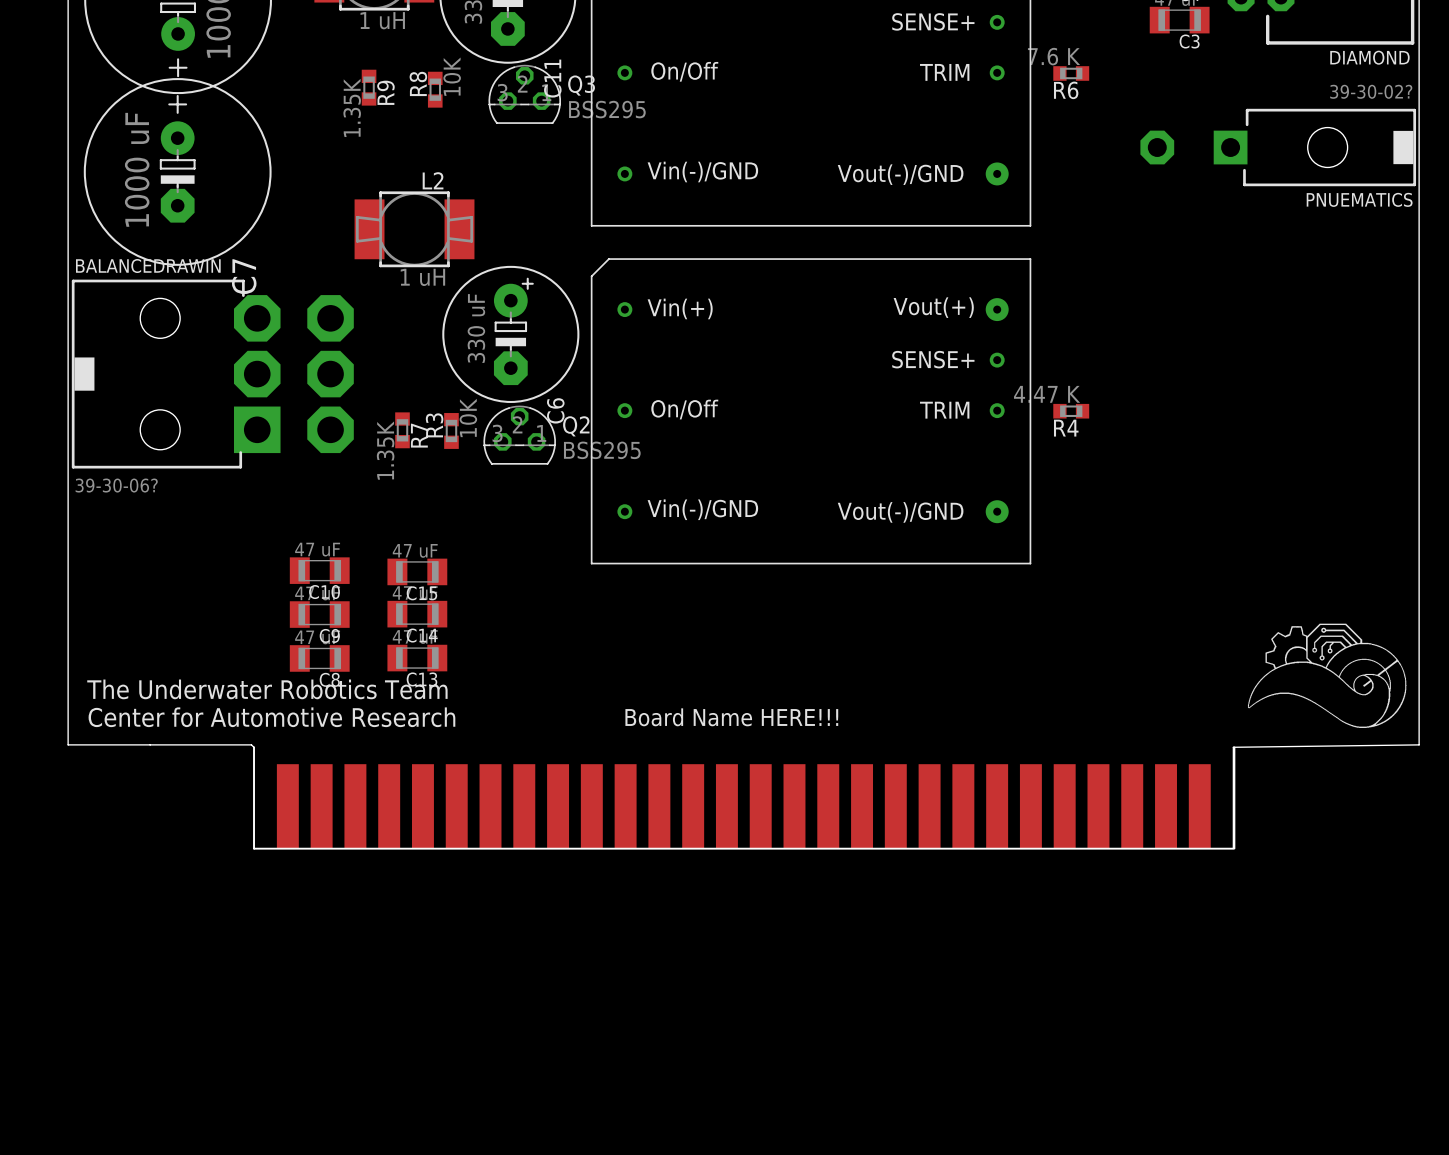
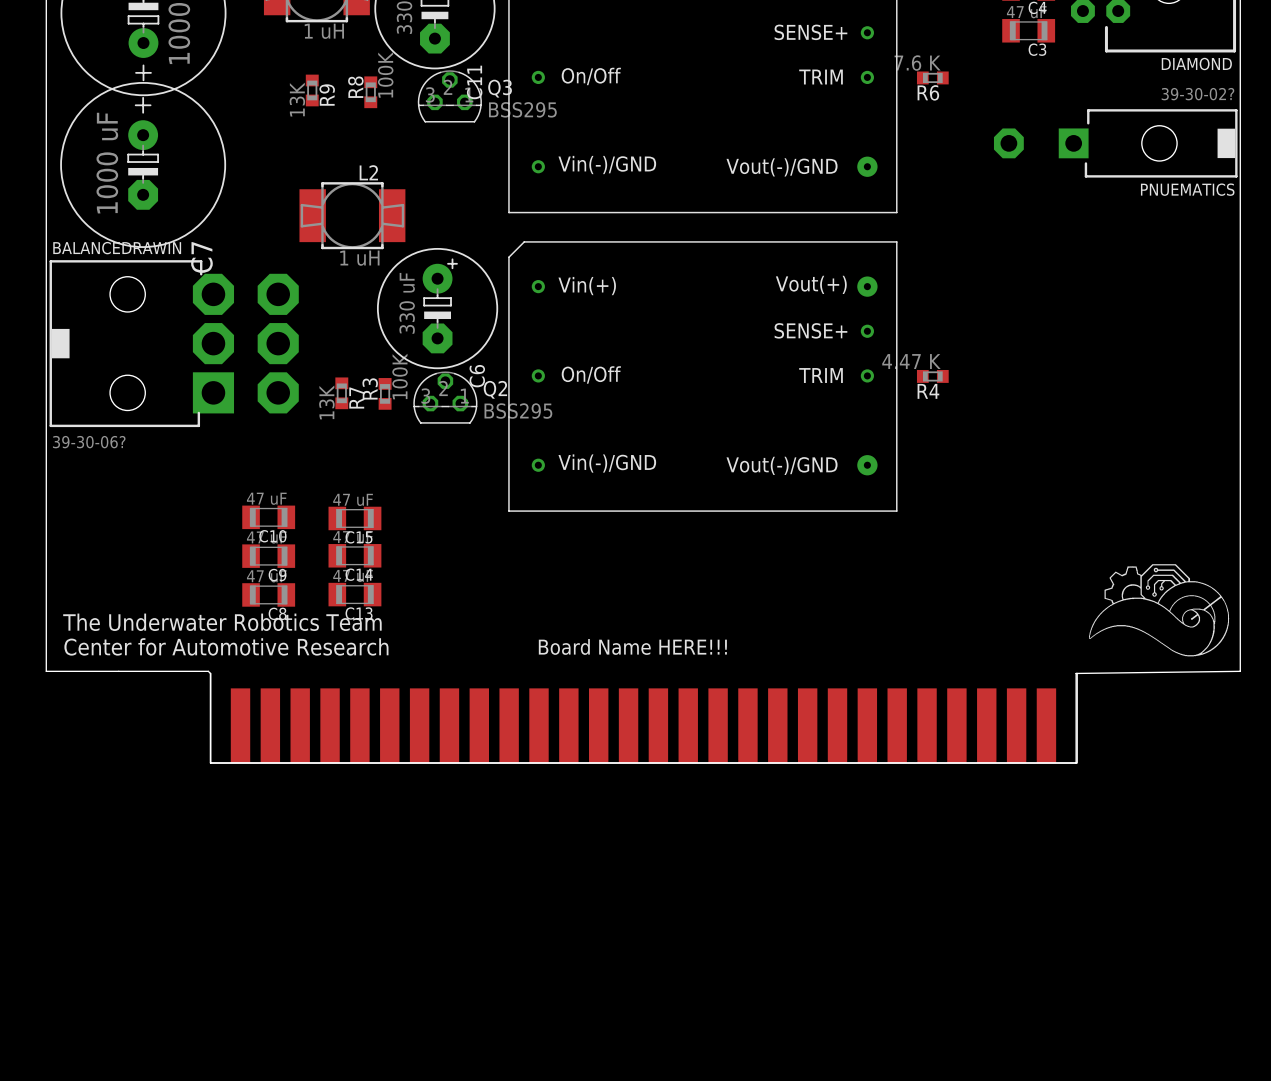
R8 value: 10K (452, 76) -> 100K (385, 74)
R9 value: 1.35K (352, 107) -> 13K (297, 99)
R3 value: 10K (468, 417) -> 100K (400, 376)
R7 value: 1.35K (385, 450) -> 13K (326, 402)

